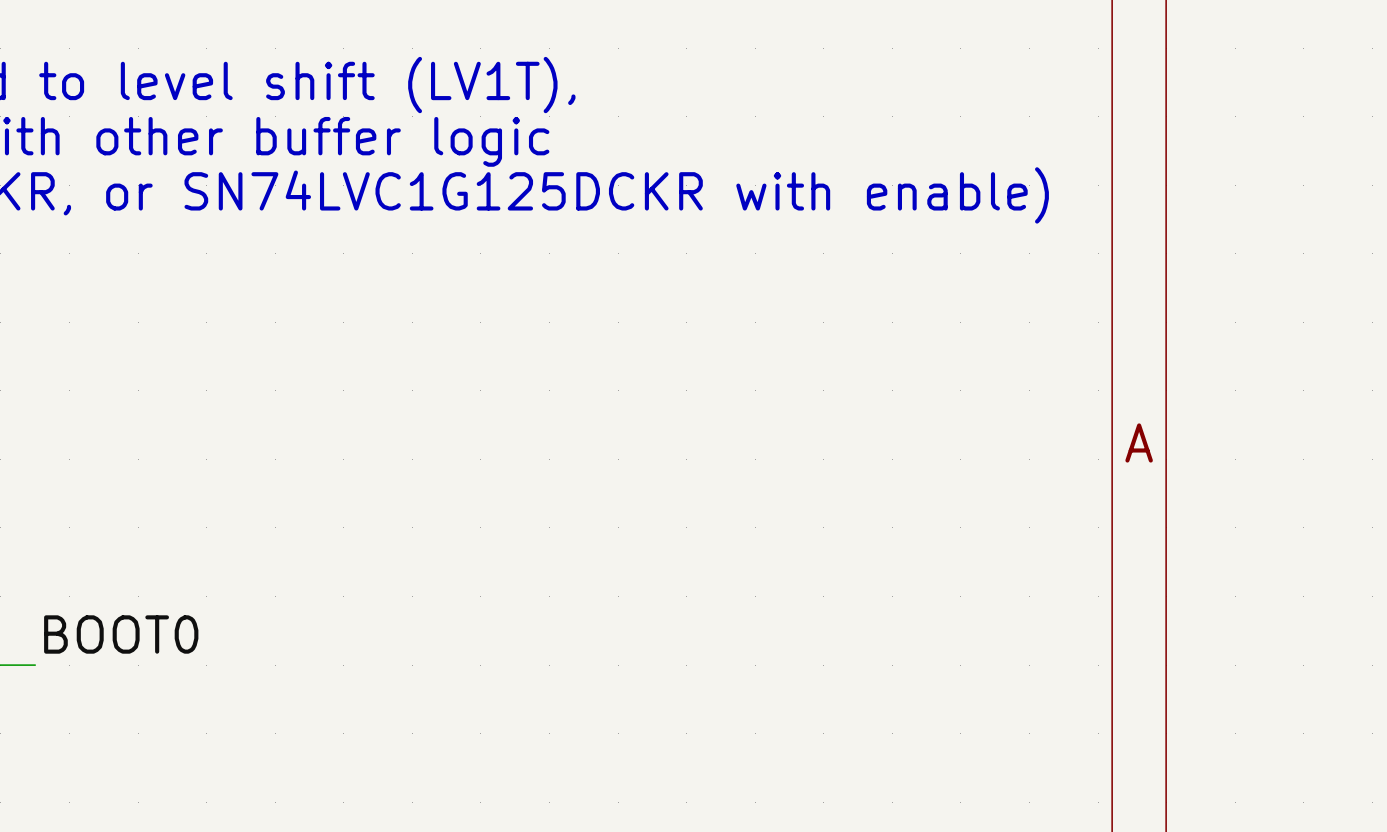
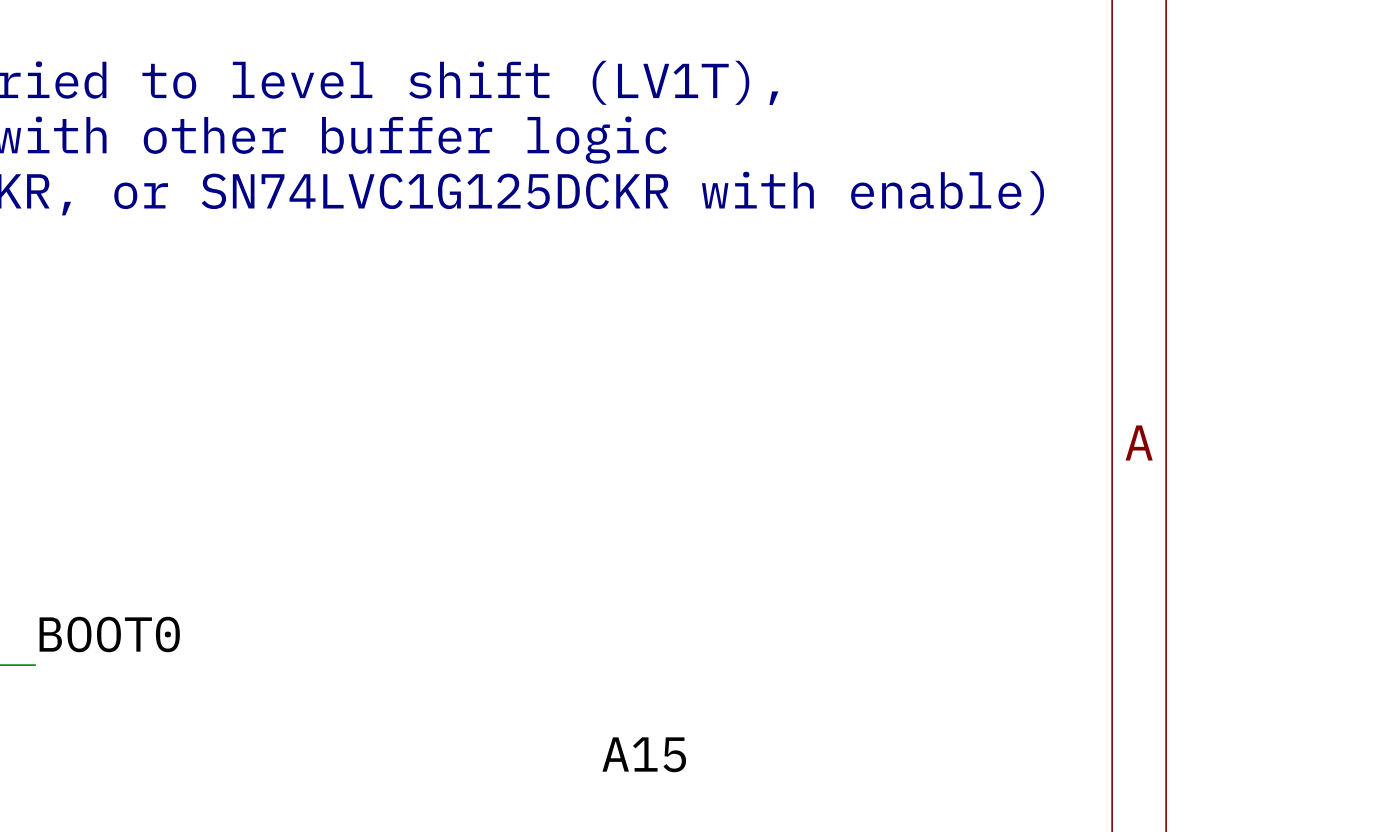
label: none -> A15 (644, 754)

